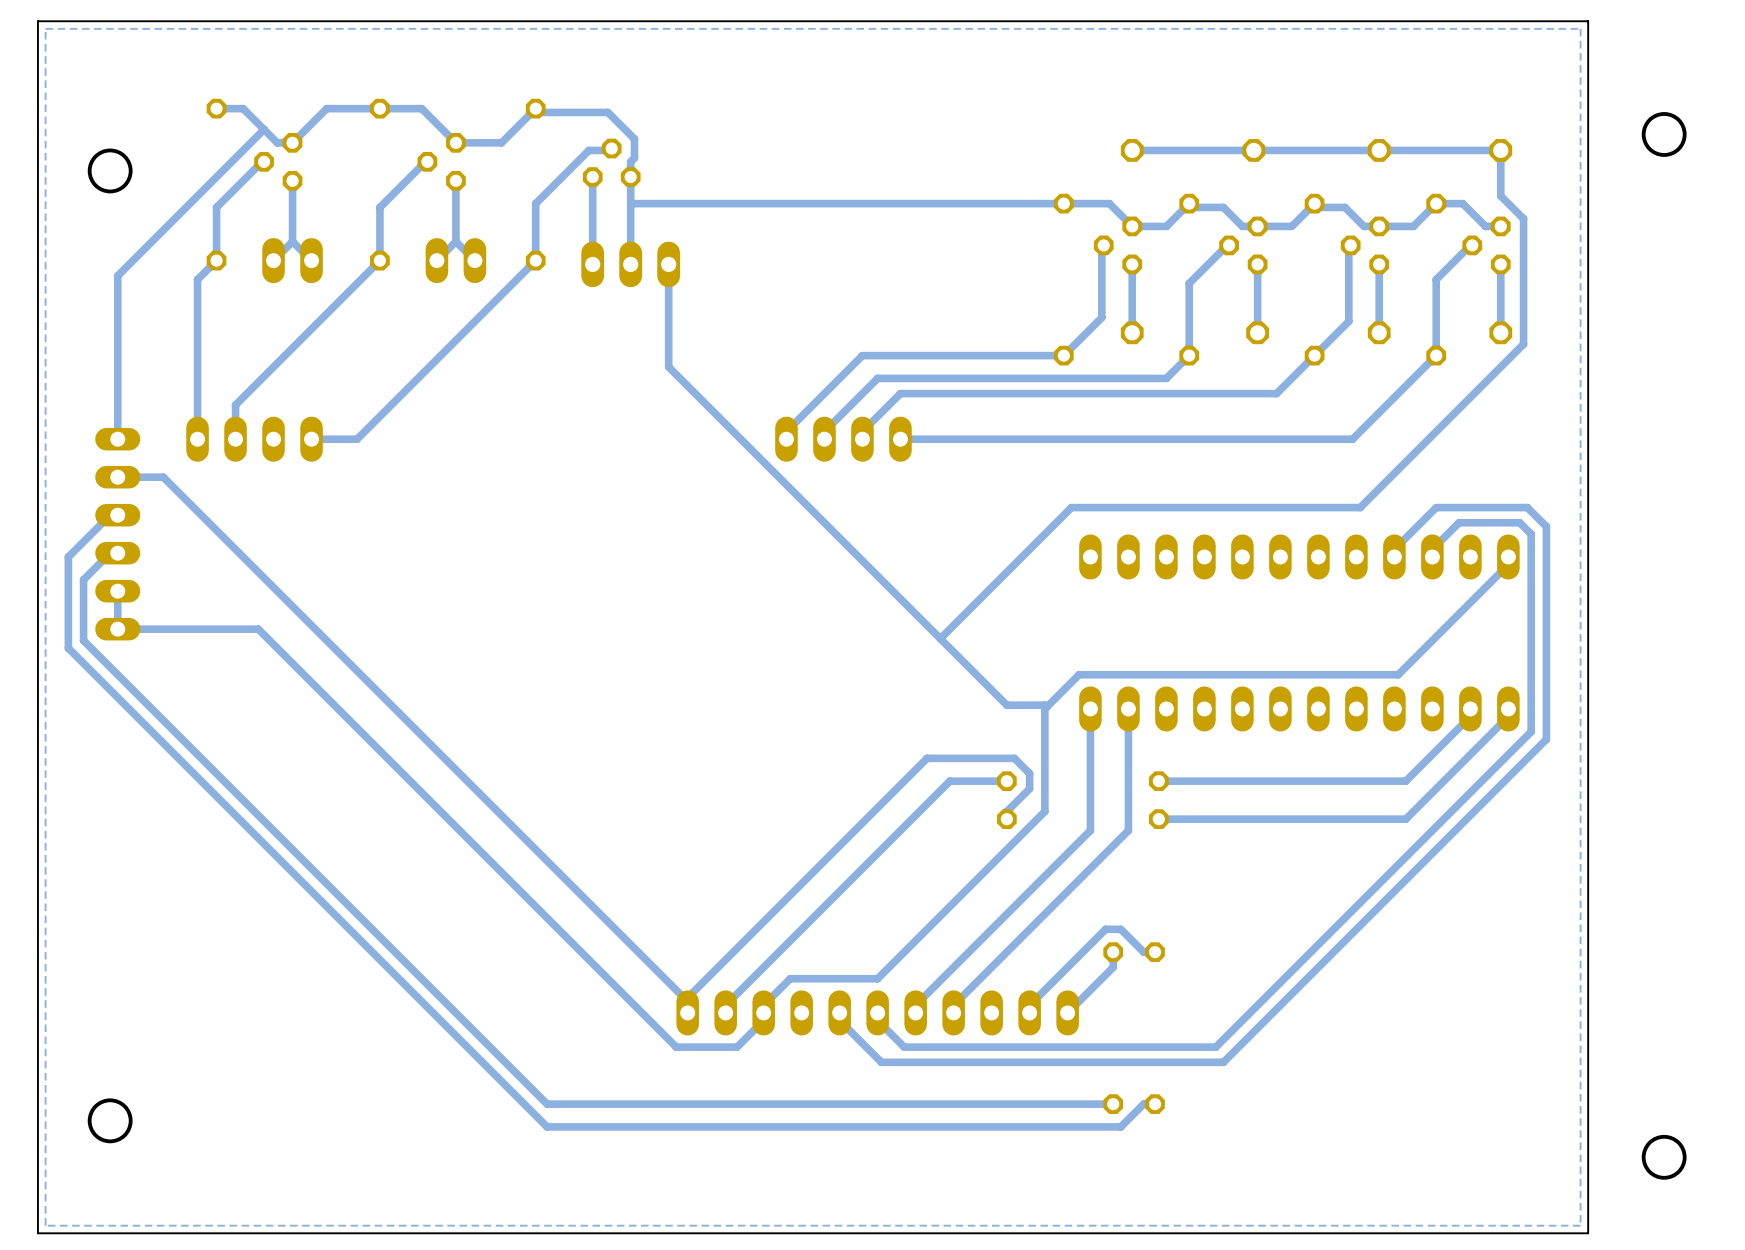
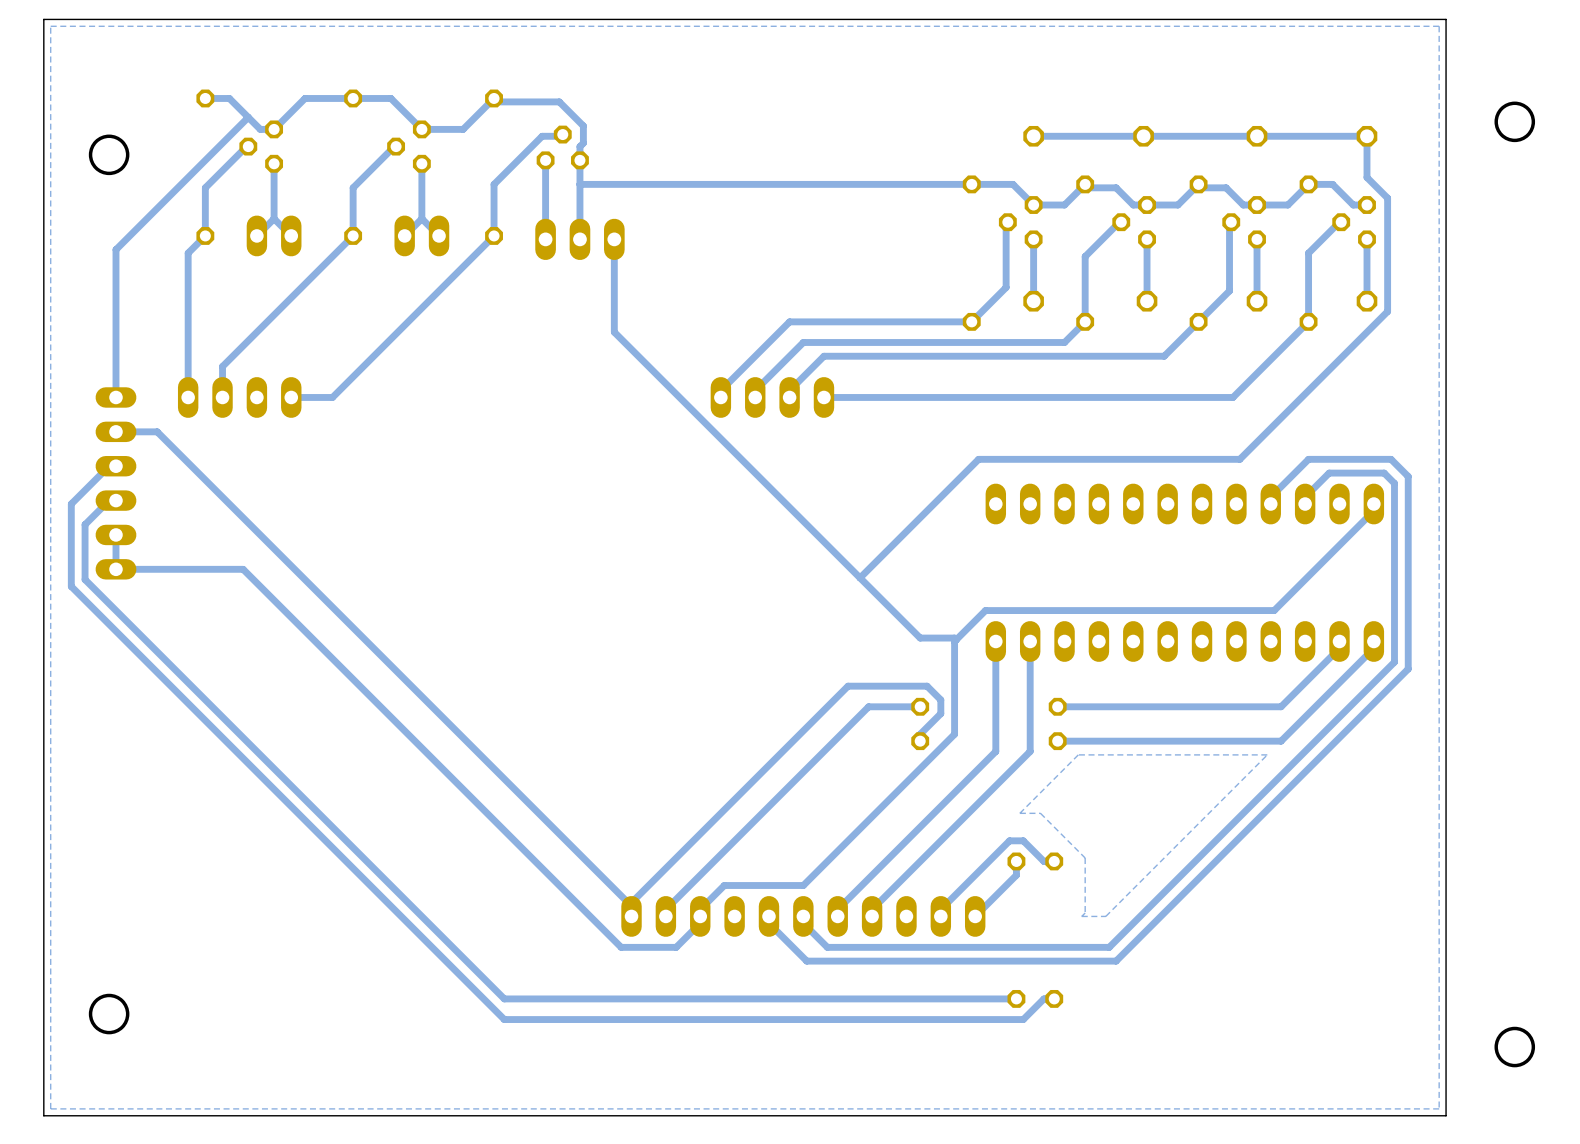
zone outline: none -> (1267, 754) (1078, 754) (1019, 813) (1040, 813) (1085, 858) (1085, 913) (1081, 916) (1105, 916) (1267, 754)

